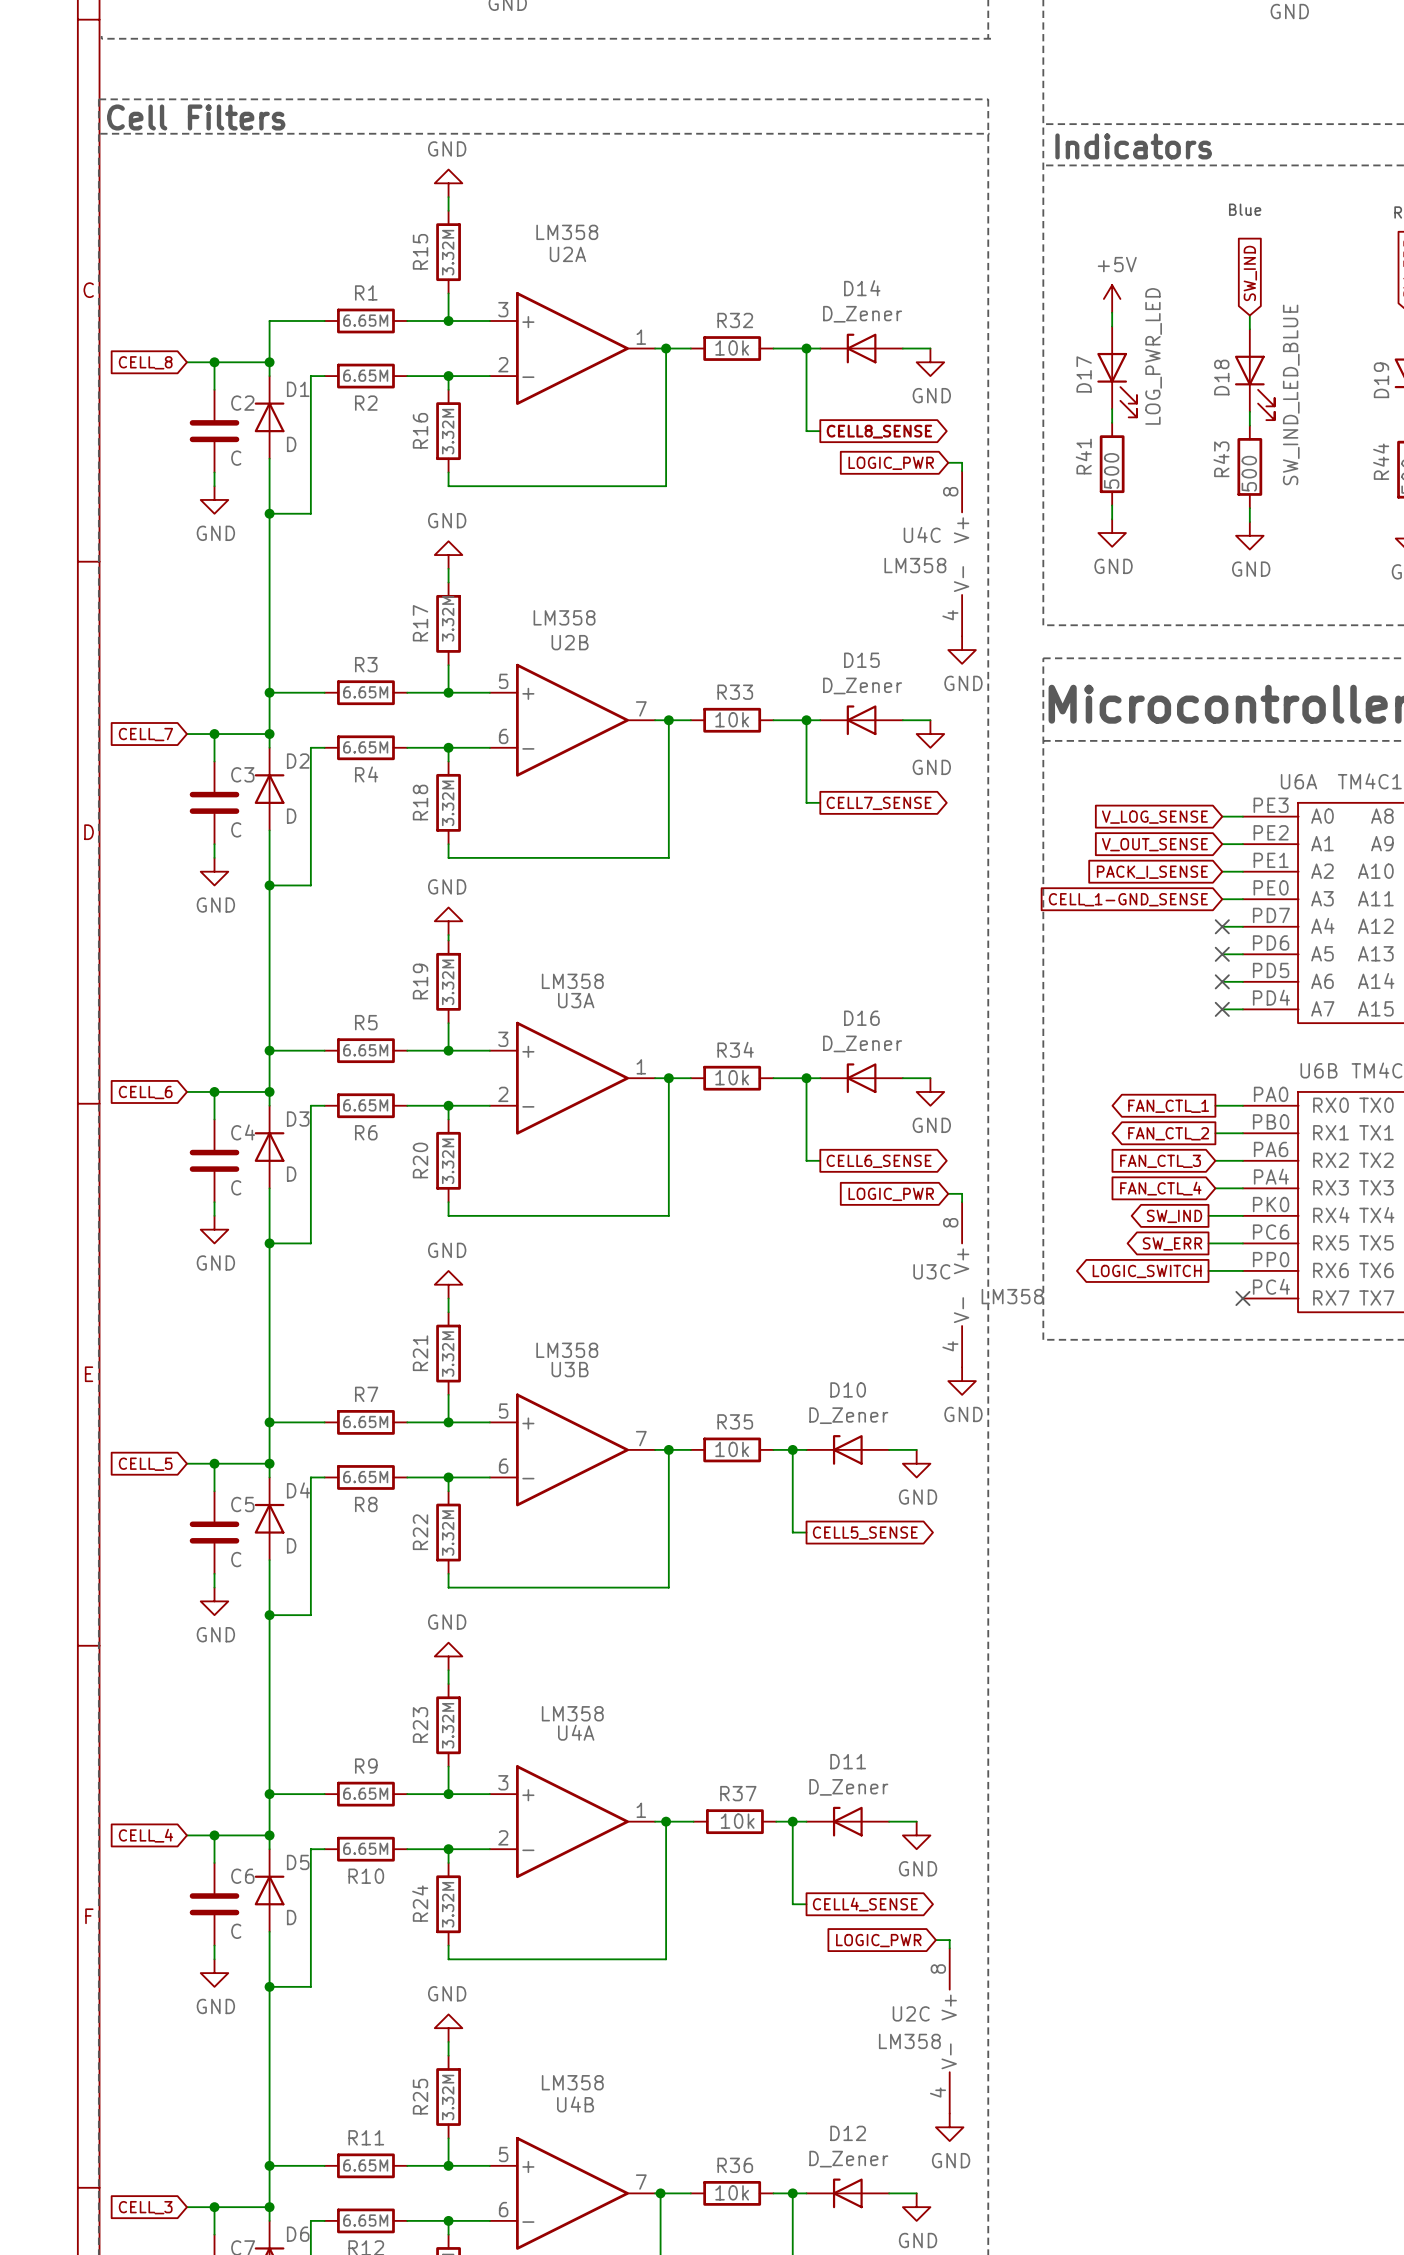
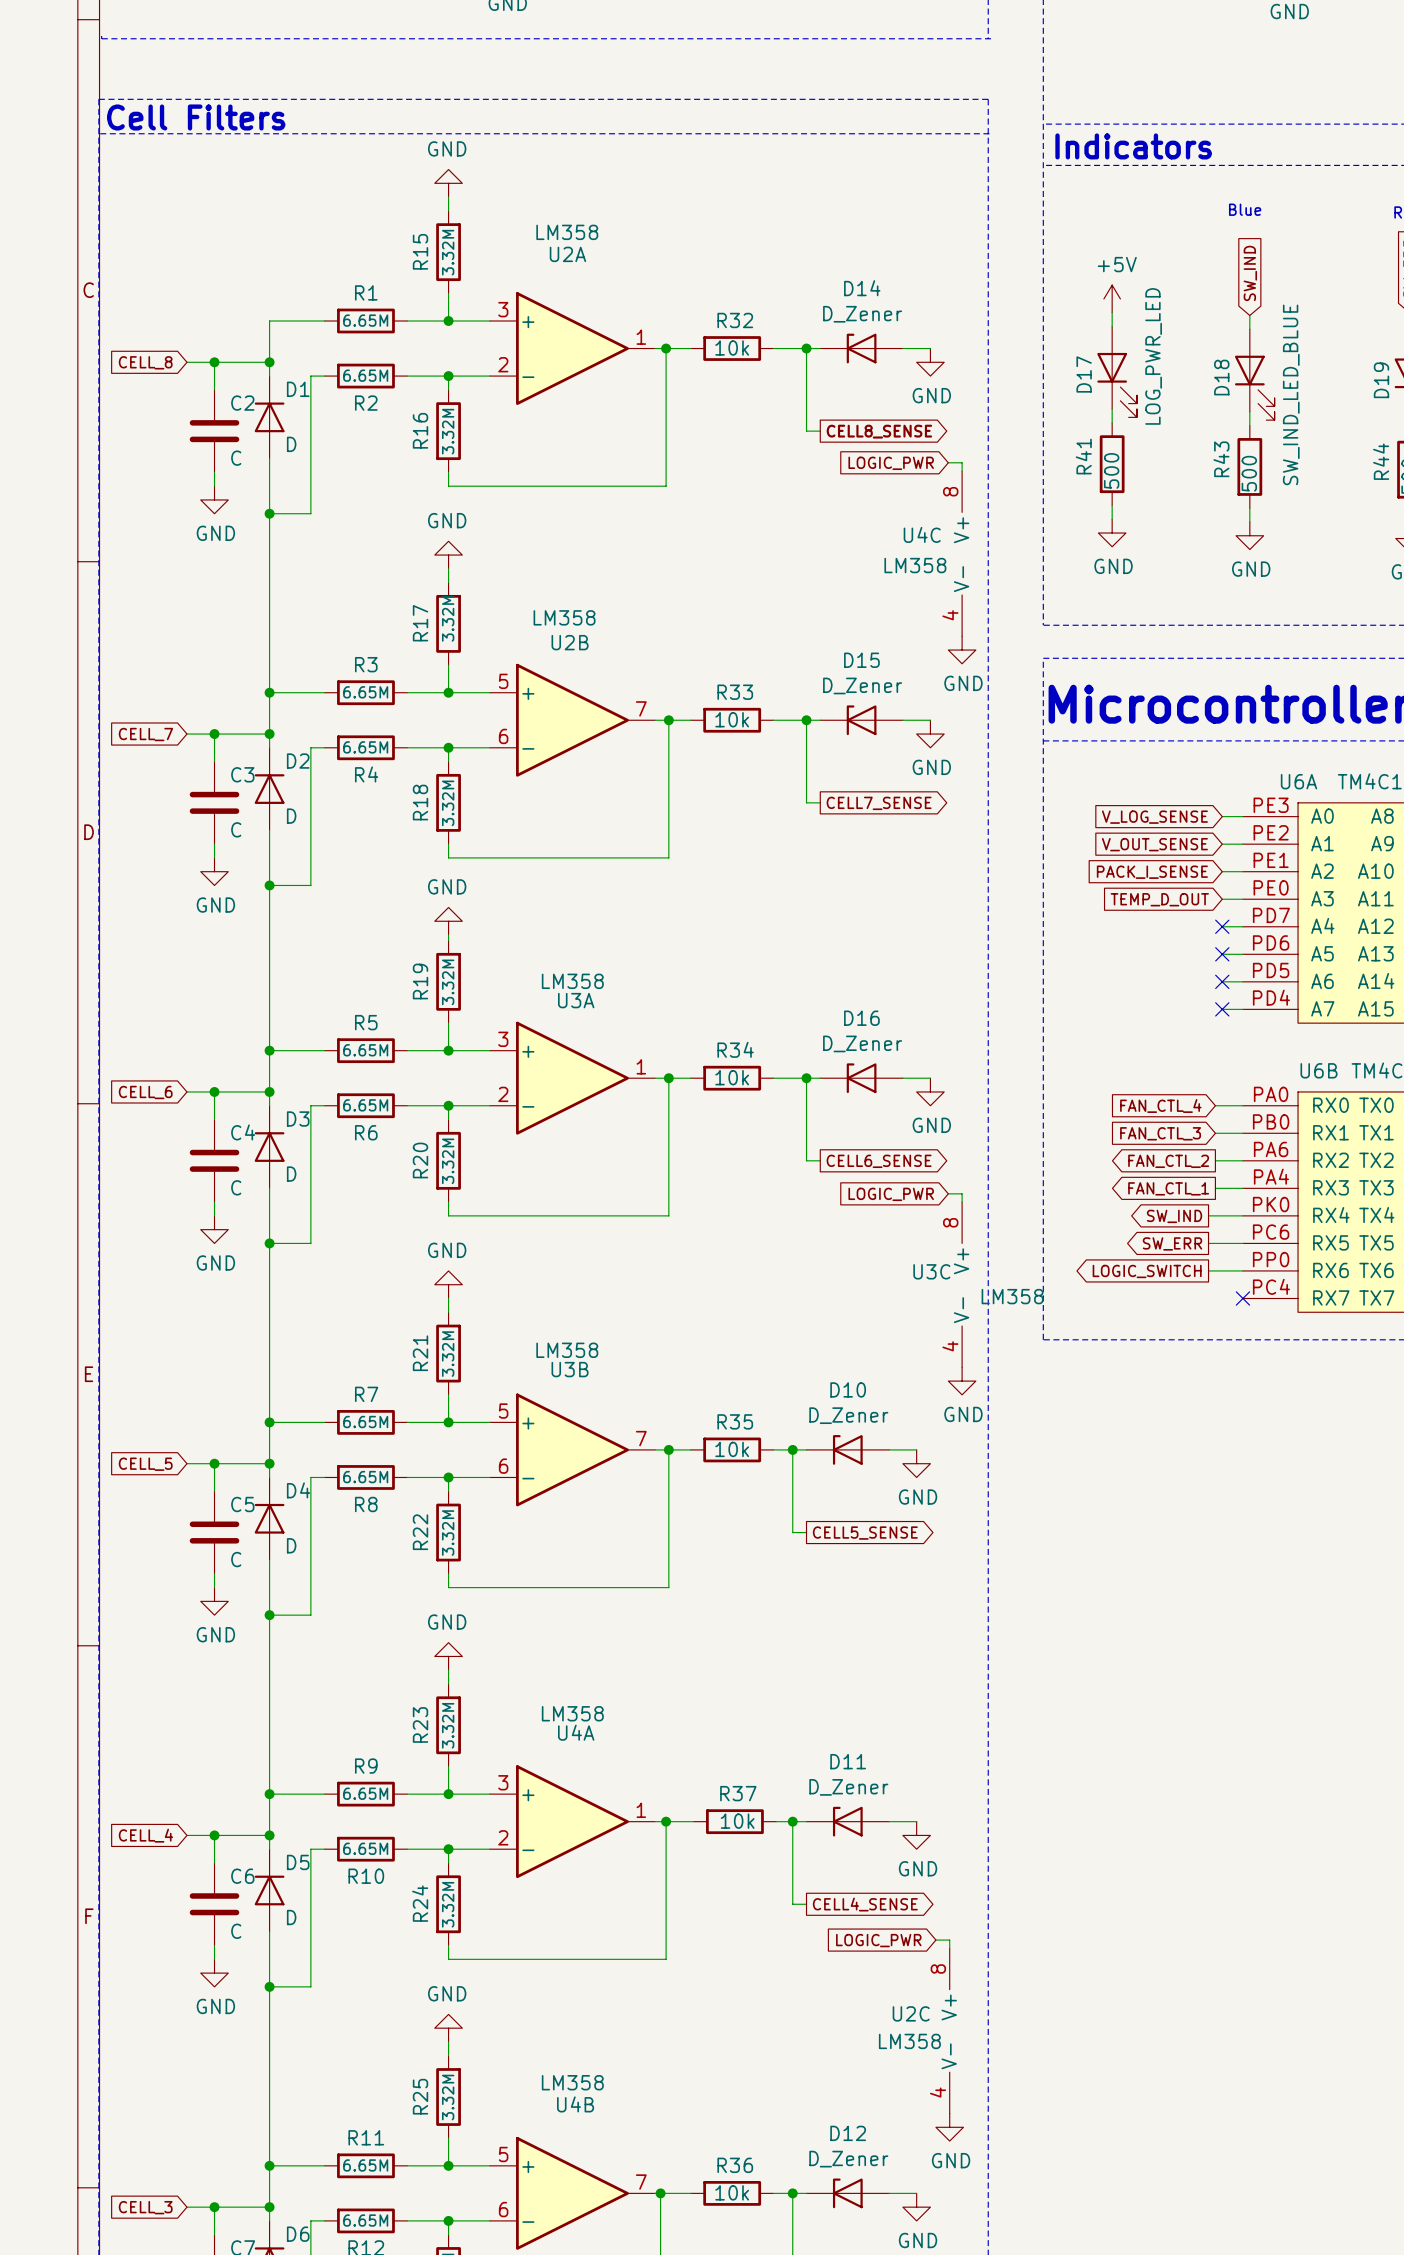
global label: CELL_1-GND_SENSE (1128, 899) -> TEMP_D_OUT (1159, 899)
global label shape: output (1168, 1106) -> input (1160, 1106)
global label: FAN_CTL_1 (1168, 1106) -> FAN_CTL_4 (1160, 1106)
global label shape: output (1168, 1133) -> input (1160, 1133)
global label: FAN_CTL_2 (1168, 1133) -> FAN_CTL_3 (1160, 1133)
global label shape: input (1160, 1161) -> output (1168, 1161)
global label: FAN_CTL_3 (1160, 1161) -> FAN_CTL_2 (1168, 1161)
global label shape: input (1160, 1188) -> output (1168, 1188)
global label: FAN_CTL_4 (1160, 1188) -> FAN_CTL_1 (1168, 1188)

